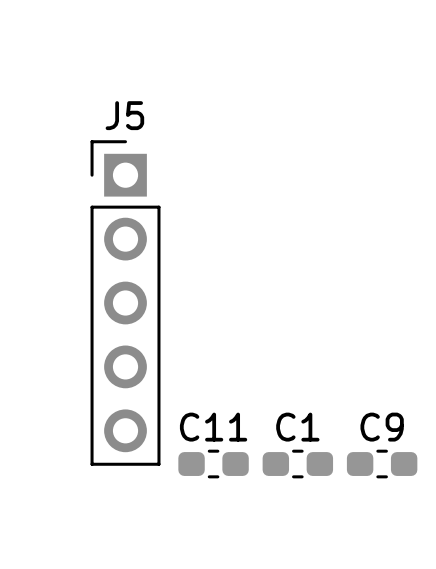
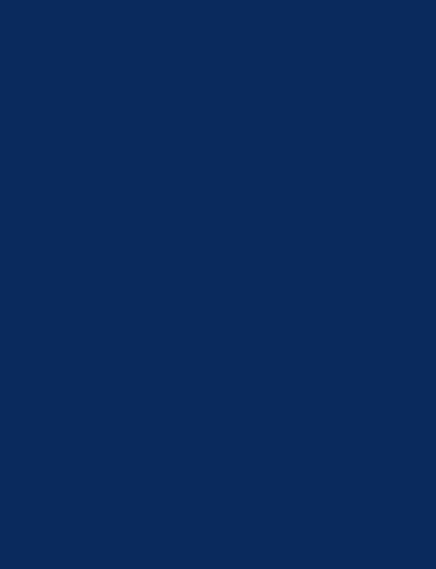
J5: (125, 303) -> none
C11: (213, 464) -> none
C1: (297, 464) -> none
C9: (382, 464) -> none

